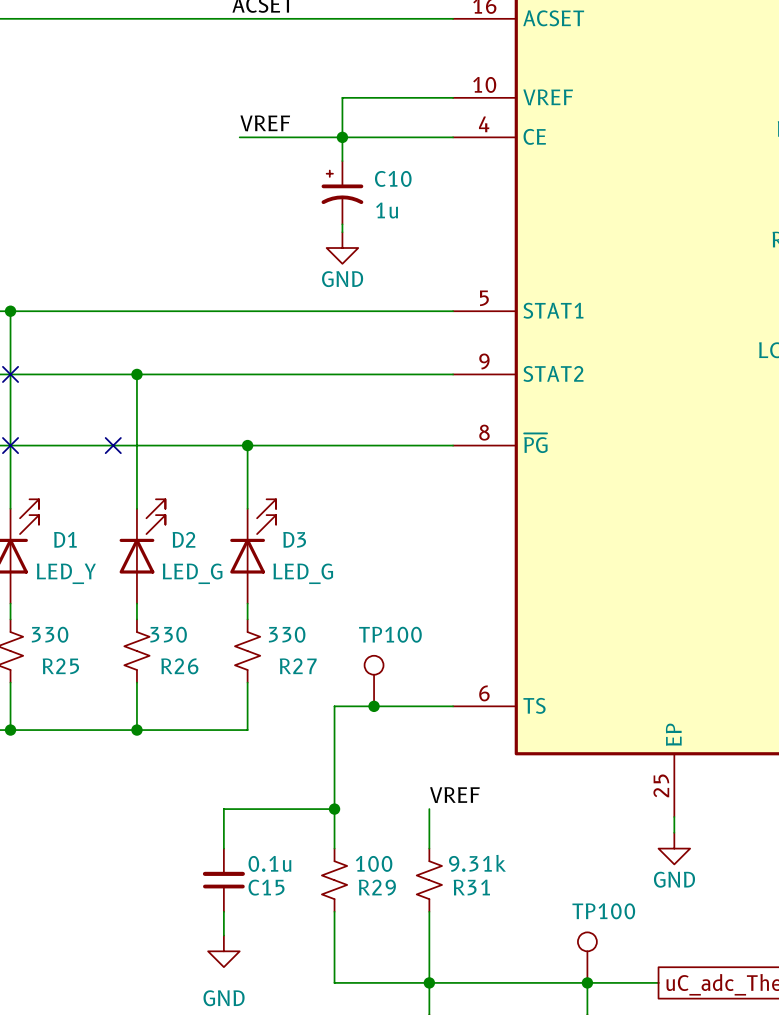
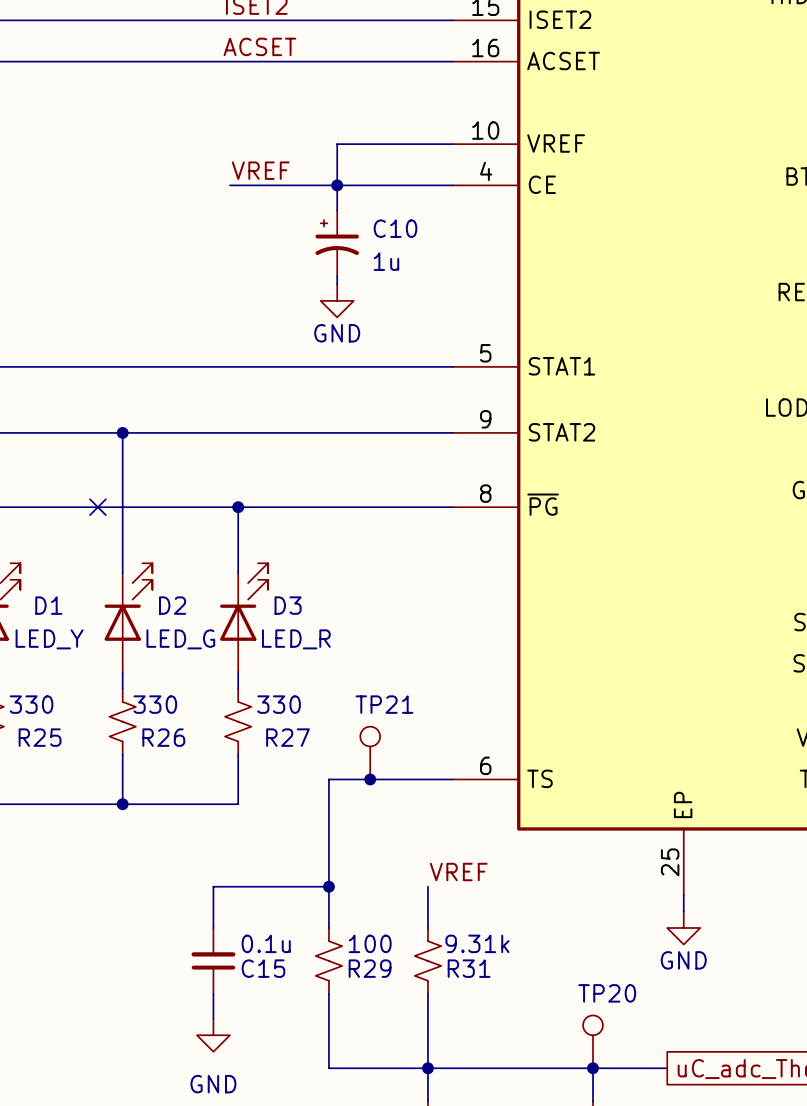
D3 value: LED_G (303, 573) -> LED_R (296, 639)
TP100 name: TP100 (390, 634) -> TP21 (384, 704)
TP100 name: TP100 (603, 911) -> TP20 (607, 993)

